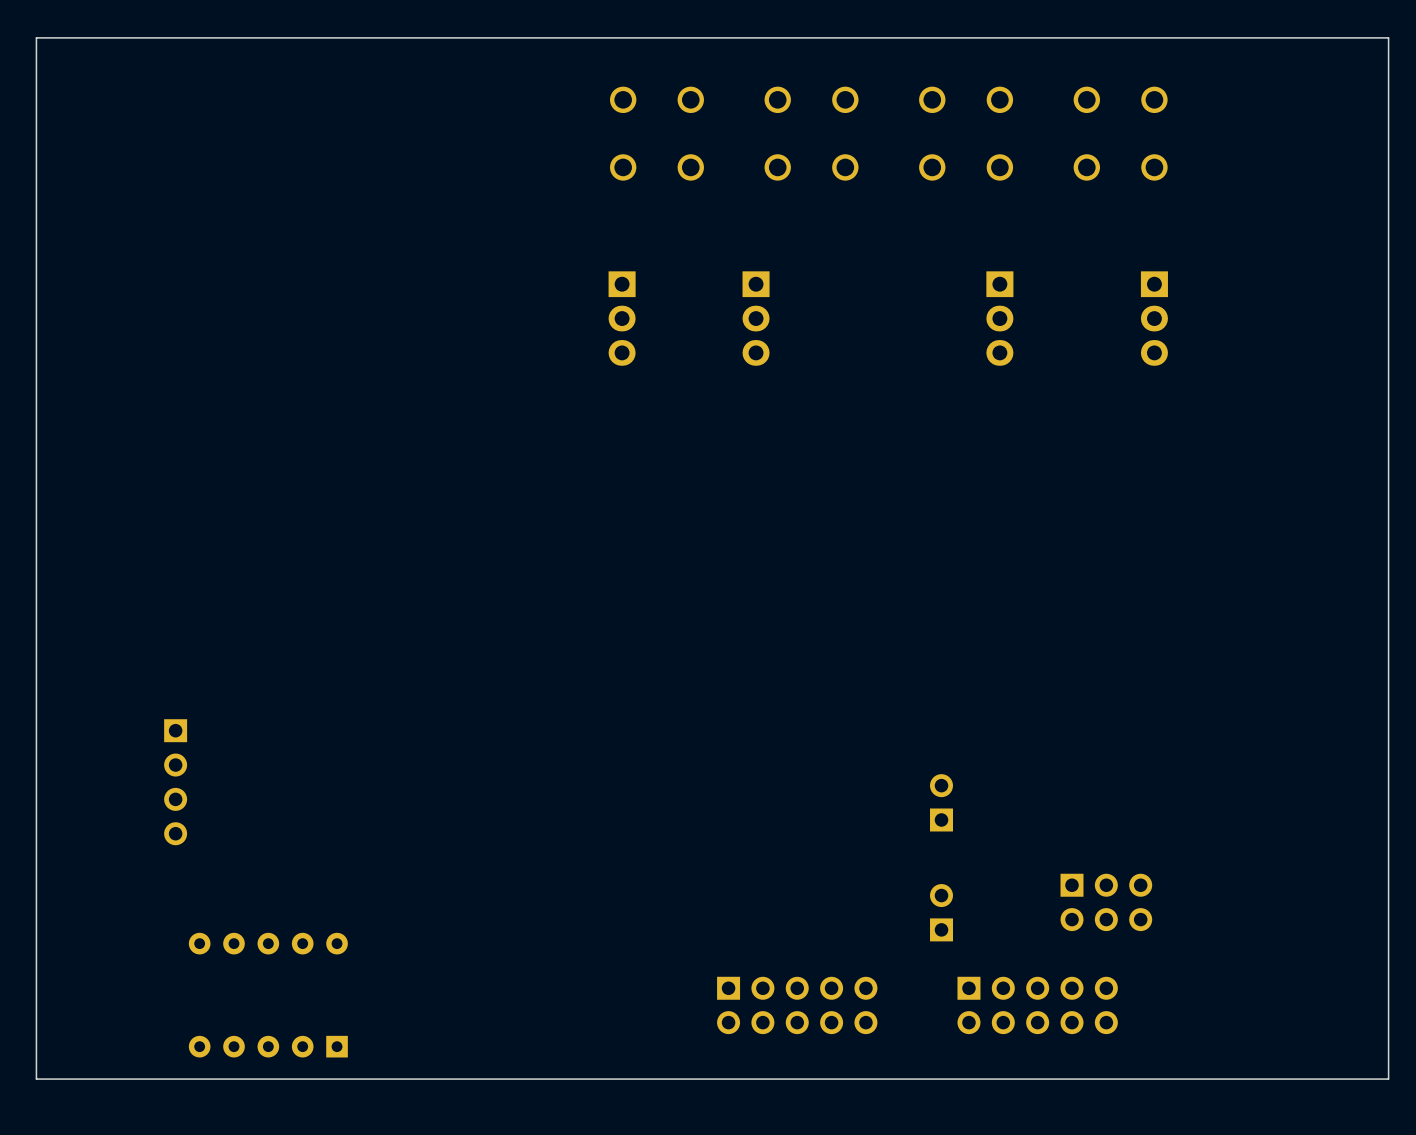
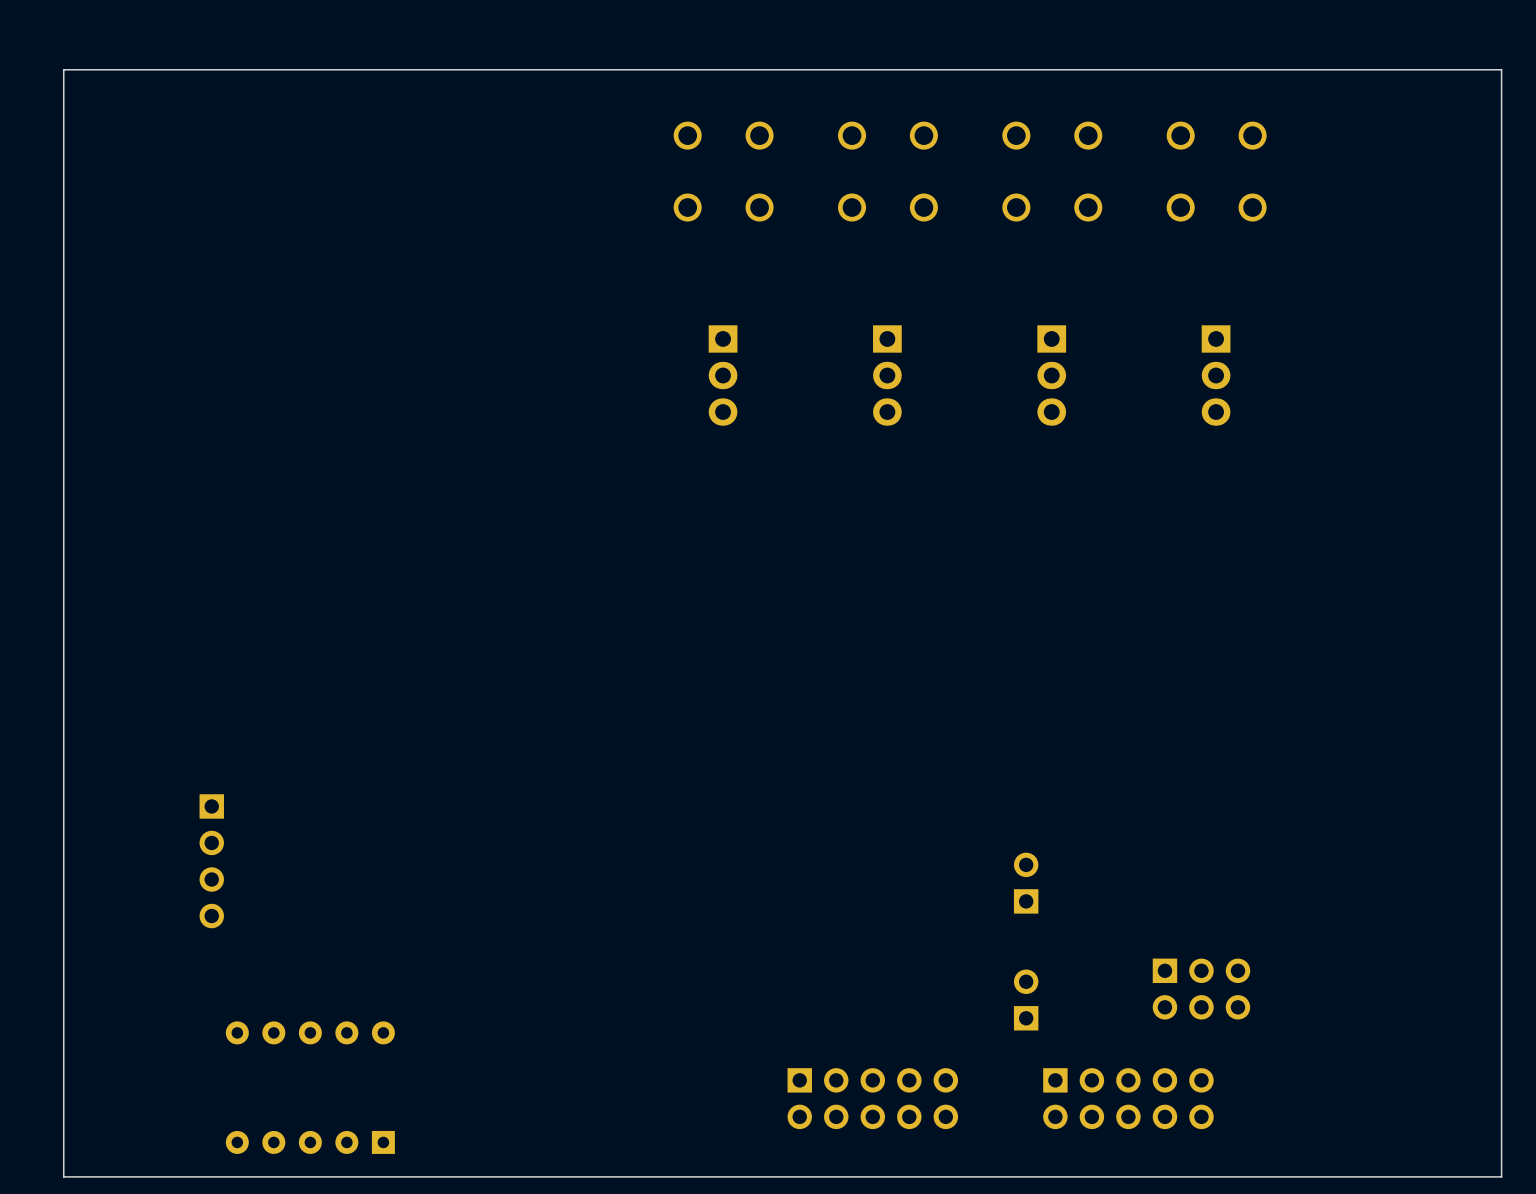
part position: (622, 318) -> (723, 375)
part: (756, 318) -> none
part position: (999, 318) -> (1051, 375)
part position: (1154, 318) -> (1216, 375)
part: none -> (887, 375)

